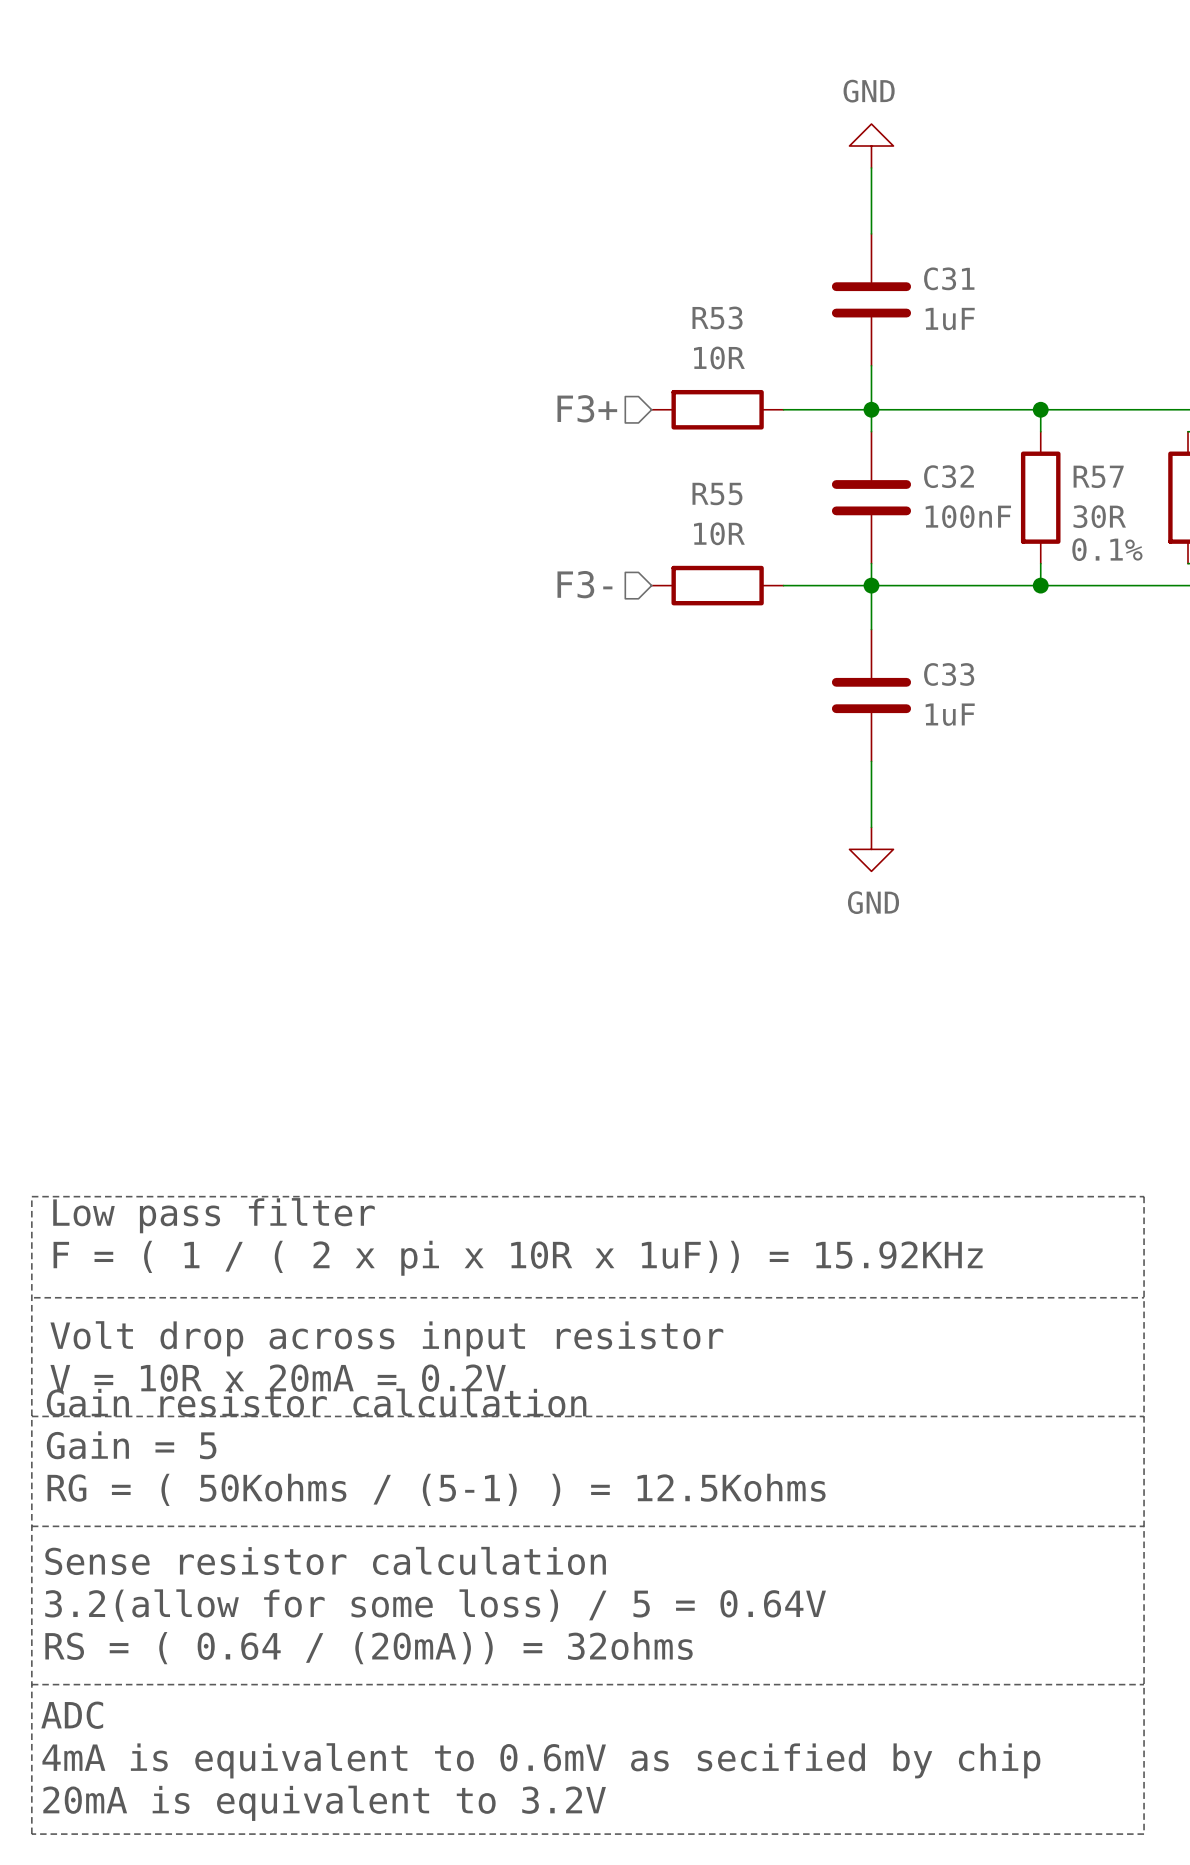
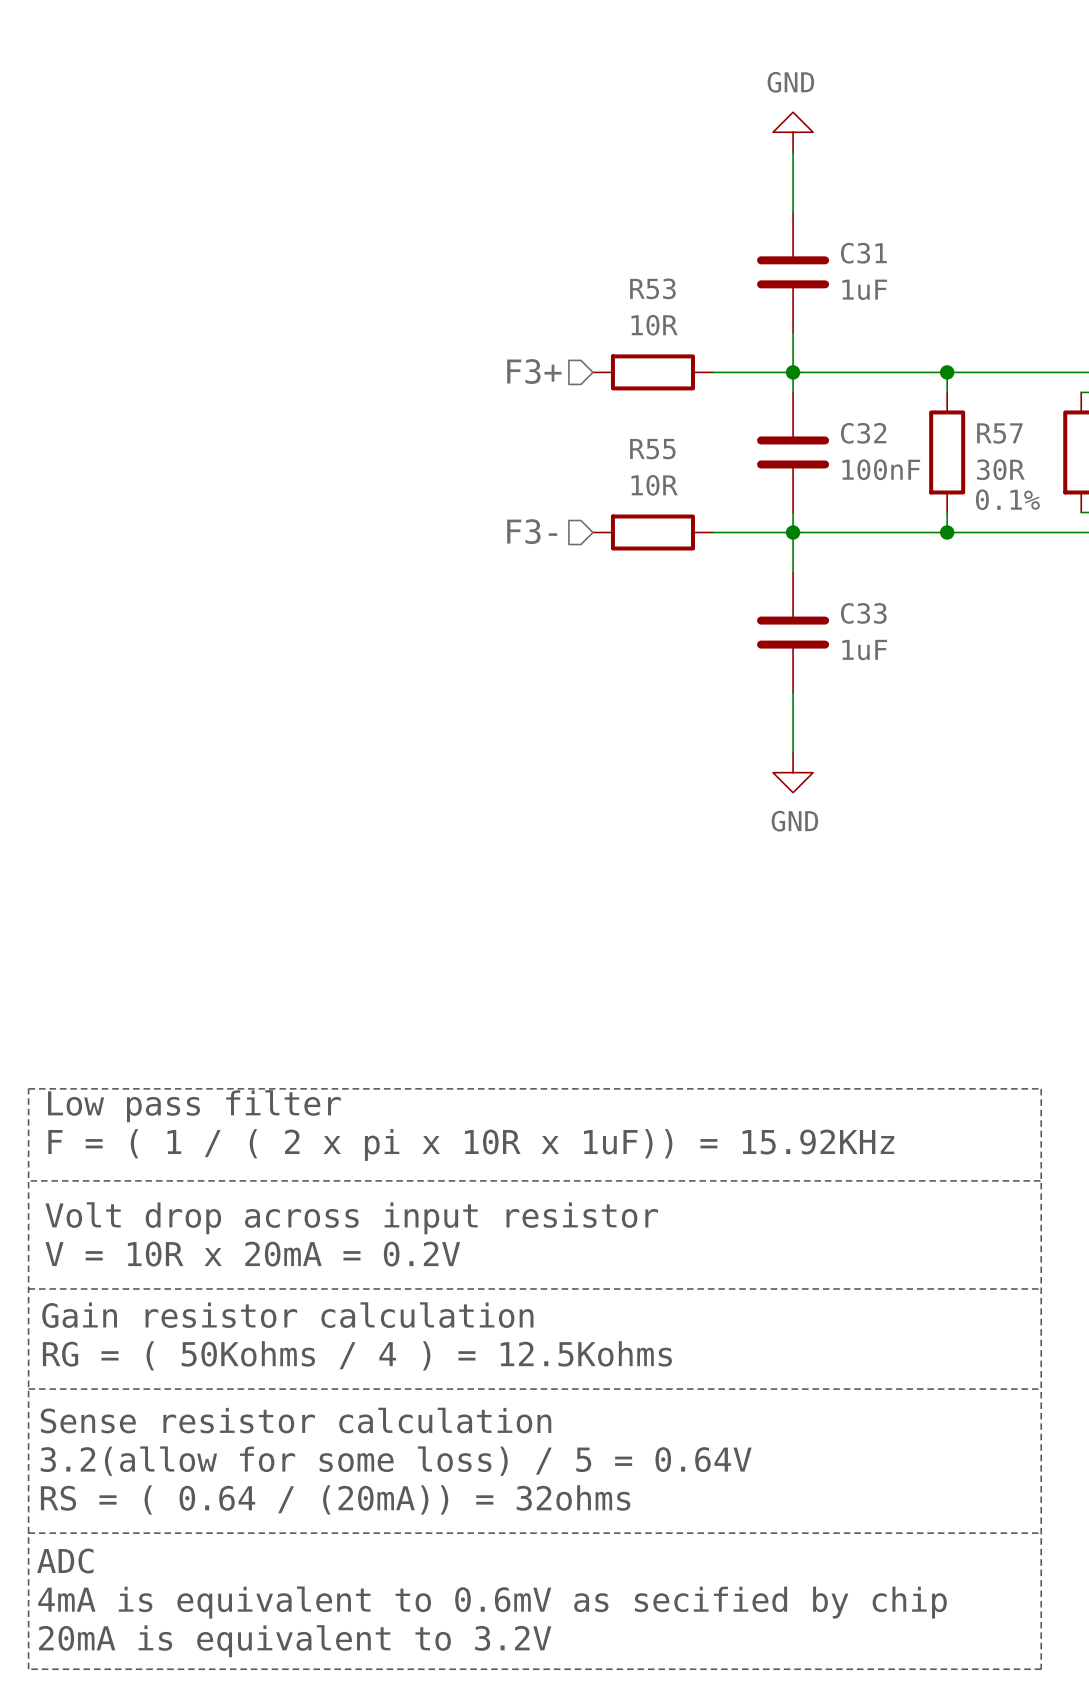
text: Gain resistor calculation (316, 1402) -> none
text: Gain = 5 (131, 1445) -> Gain resistor calculation (287, 1315)
text: RG = ( 50Kohms / (5-1) ) = 12.5Kohms (436, 1489) -> RG = ( 50Kohms / 4 ) = 12.5Kohms (357, 1355)

